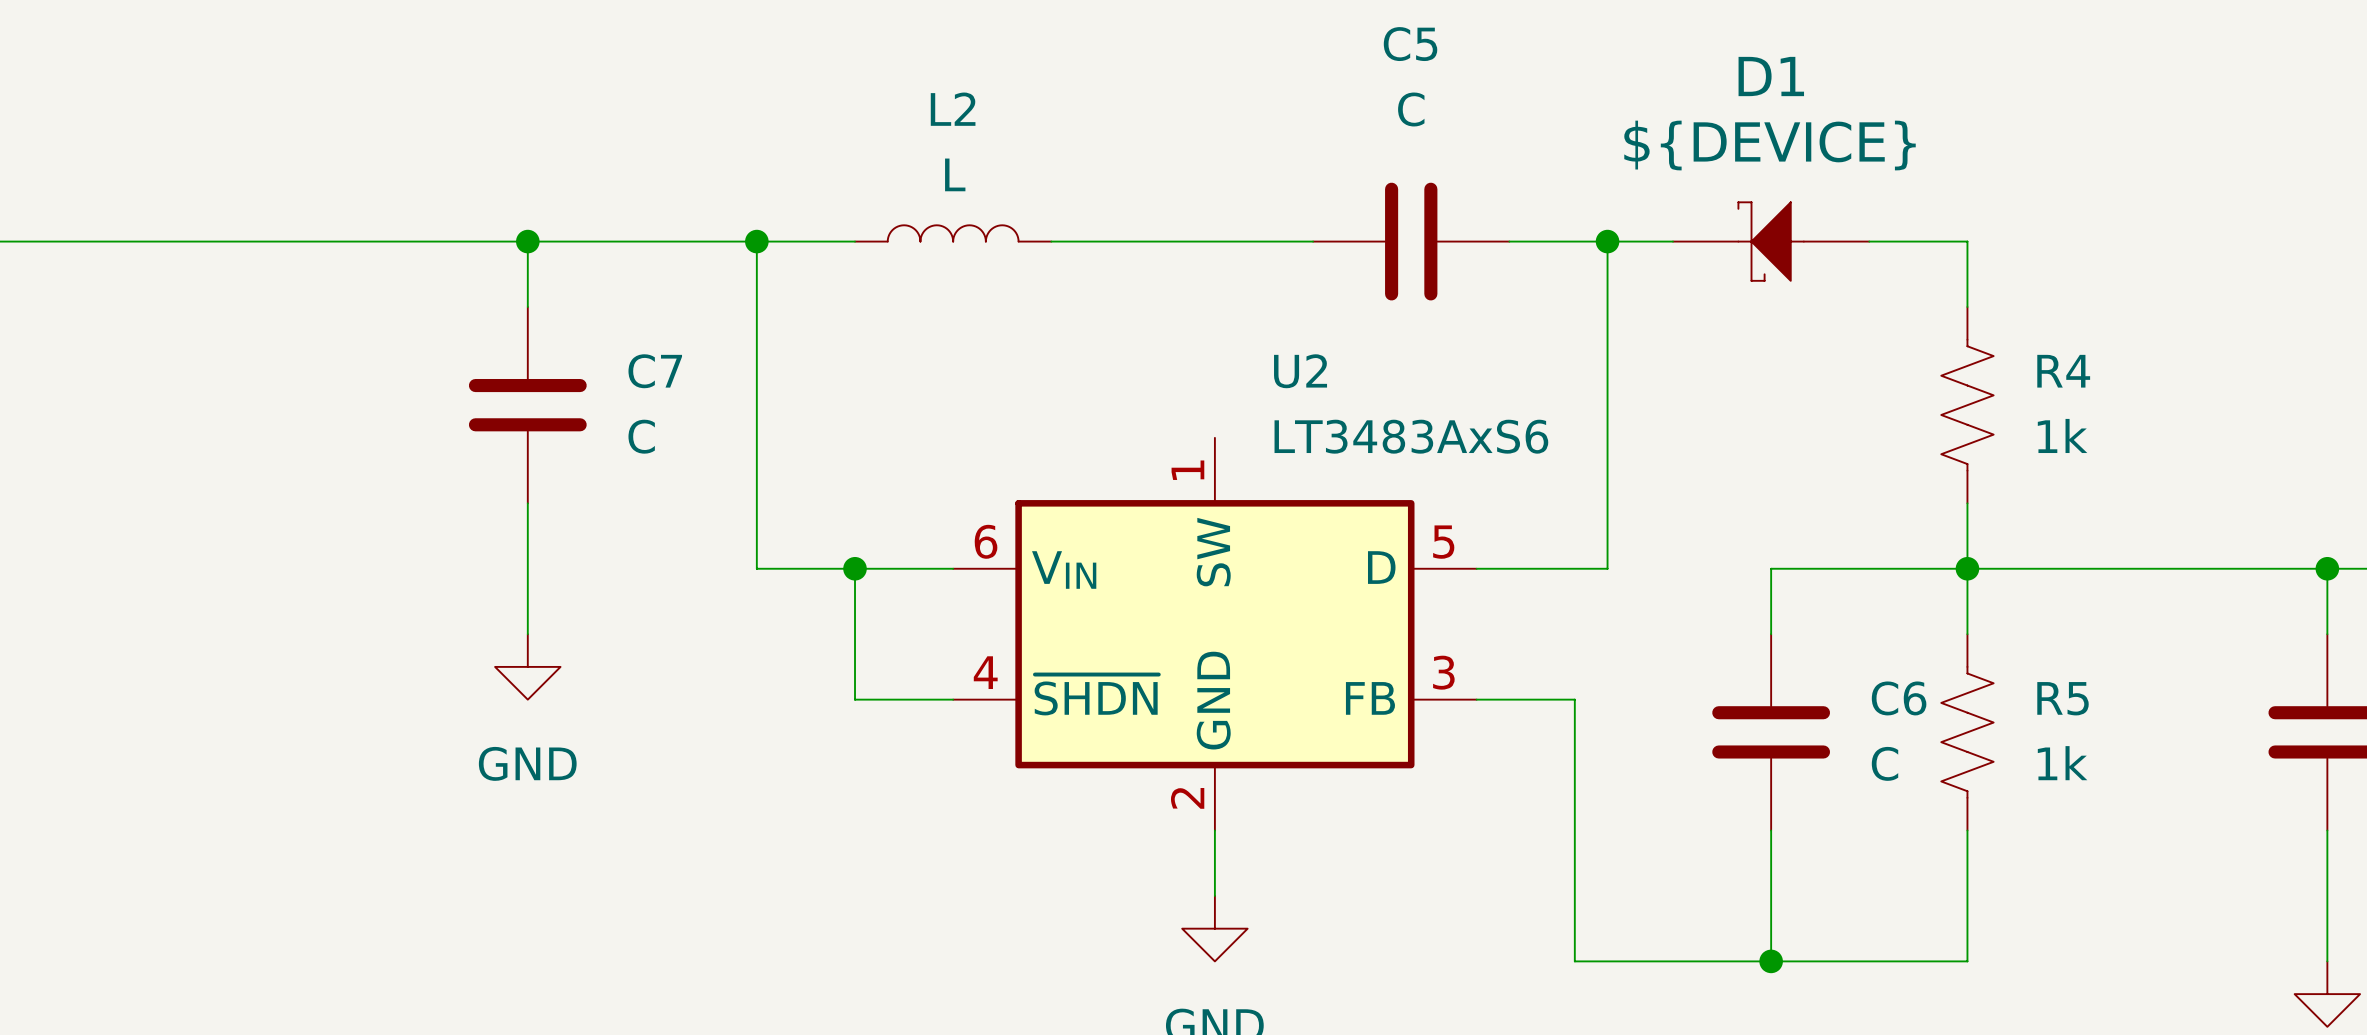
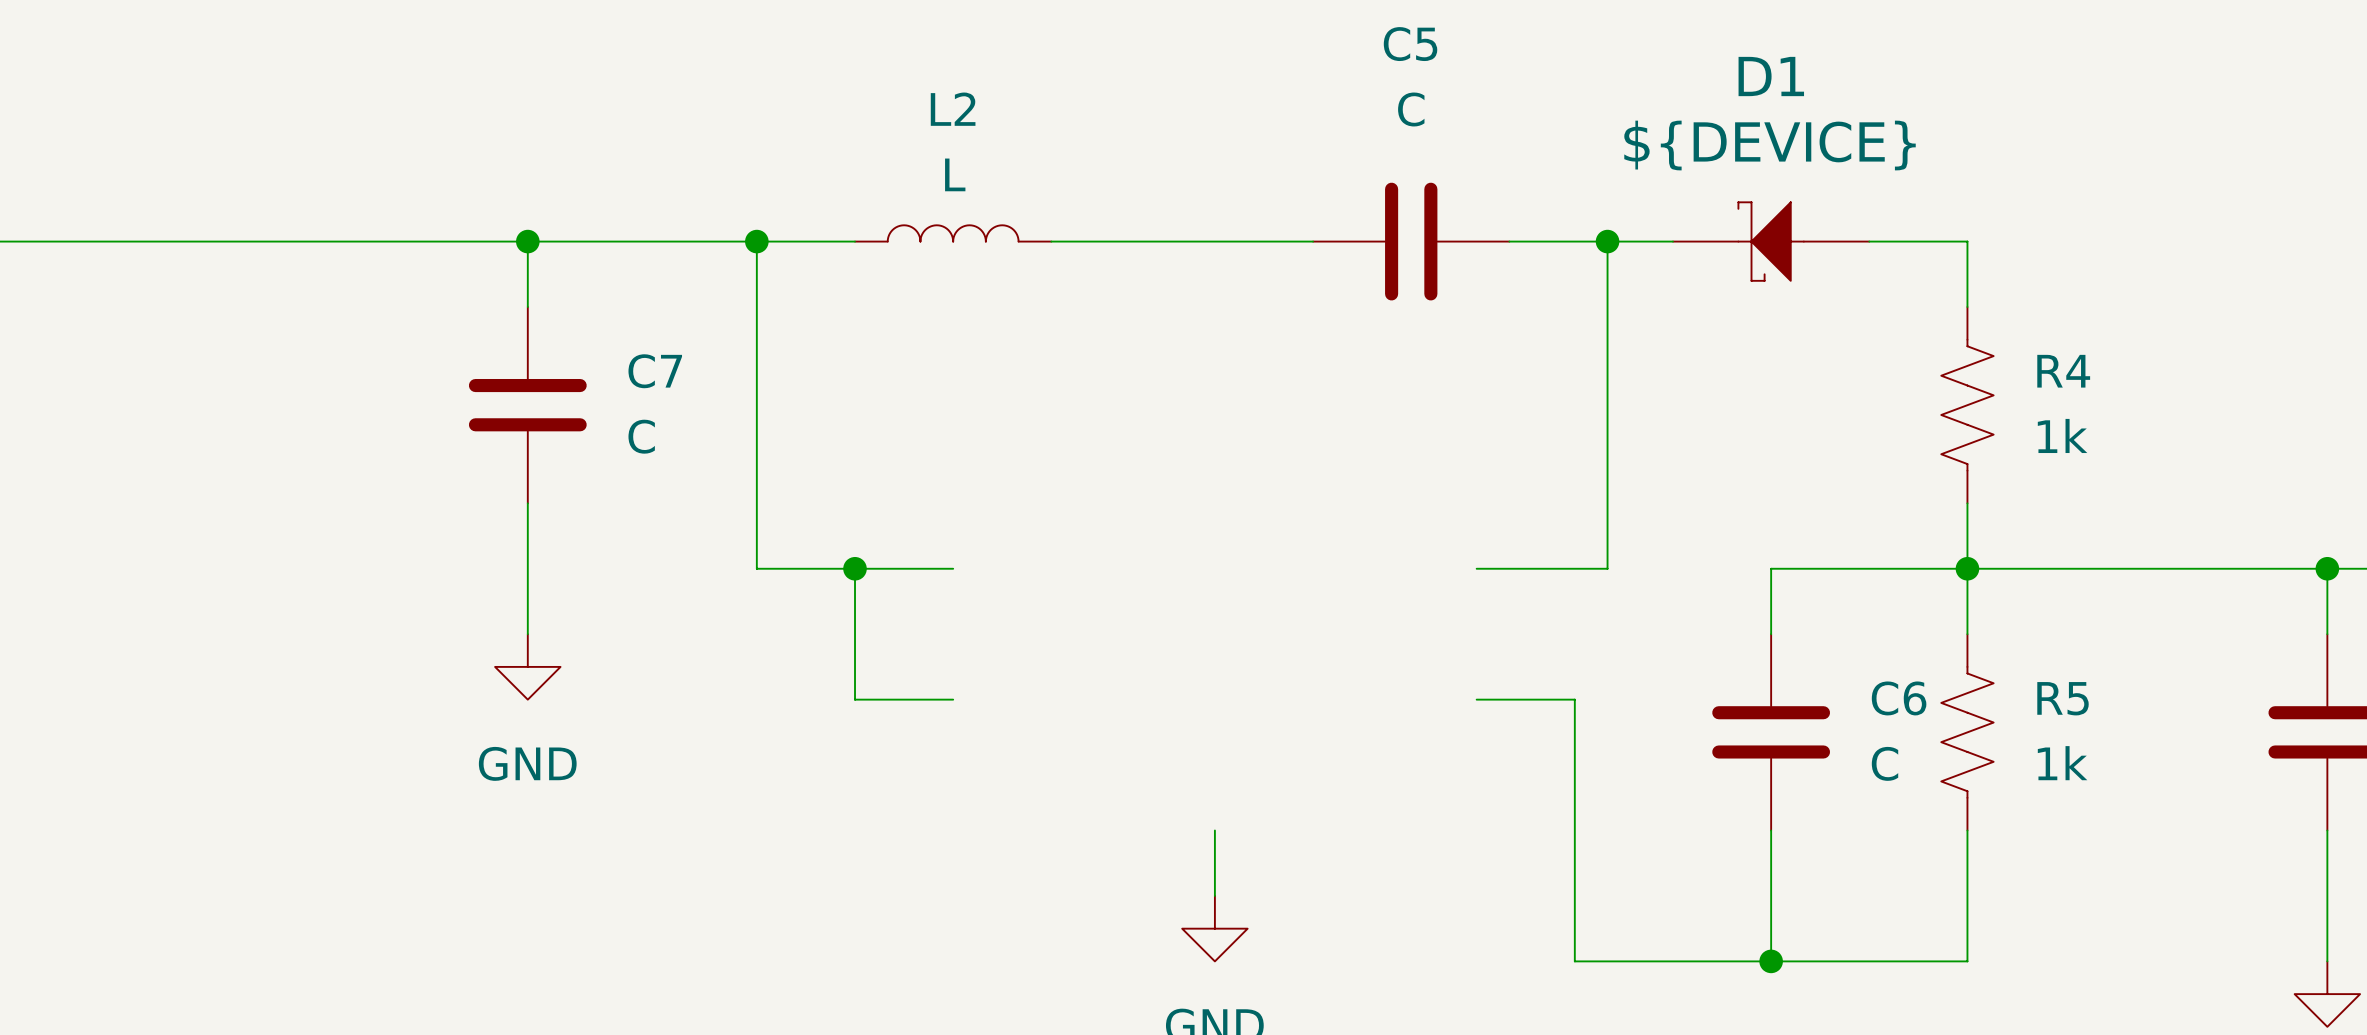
U2: LT3483AxS6 (1214, 634) -> none

